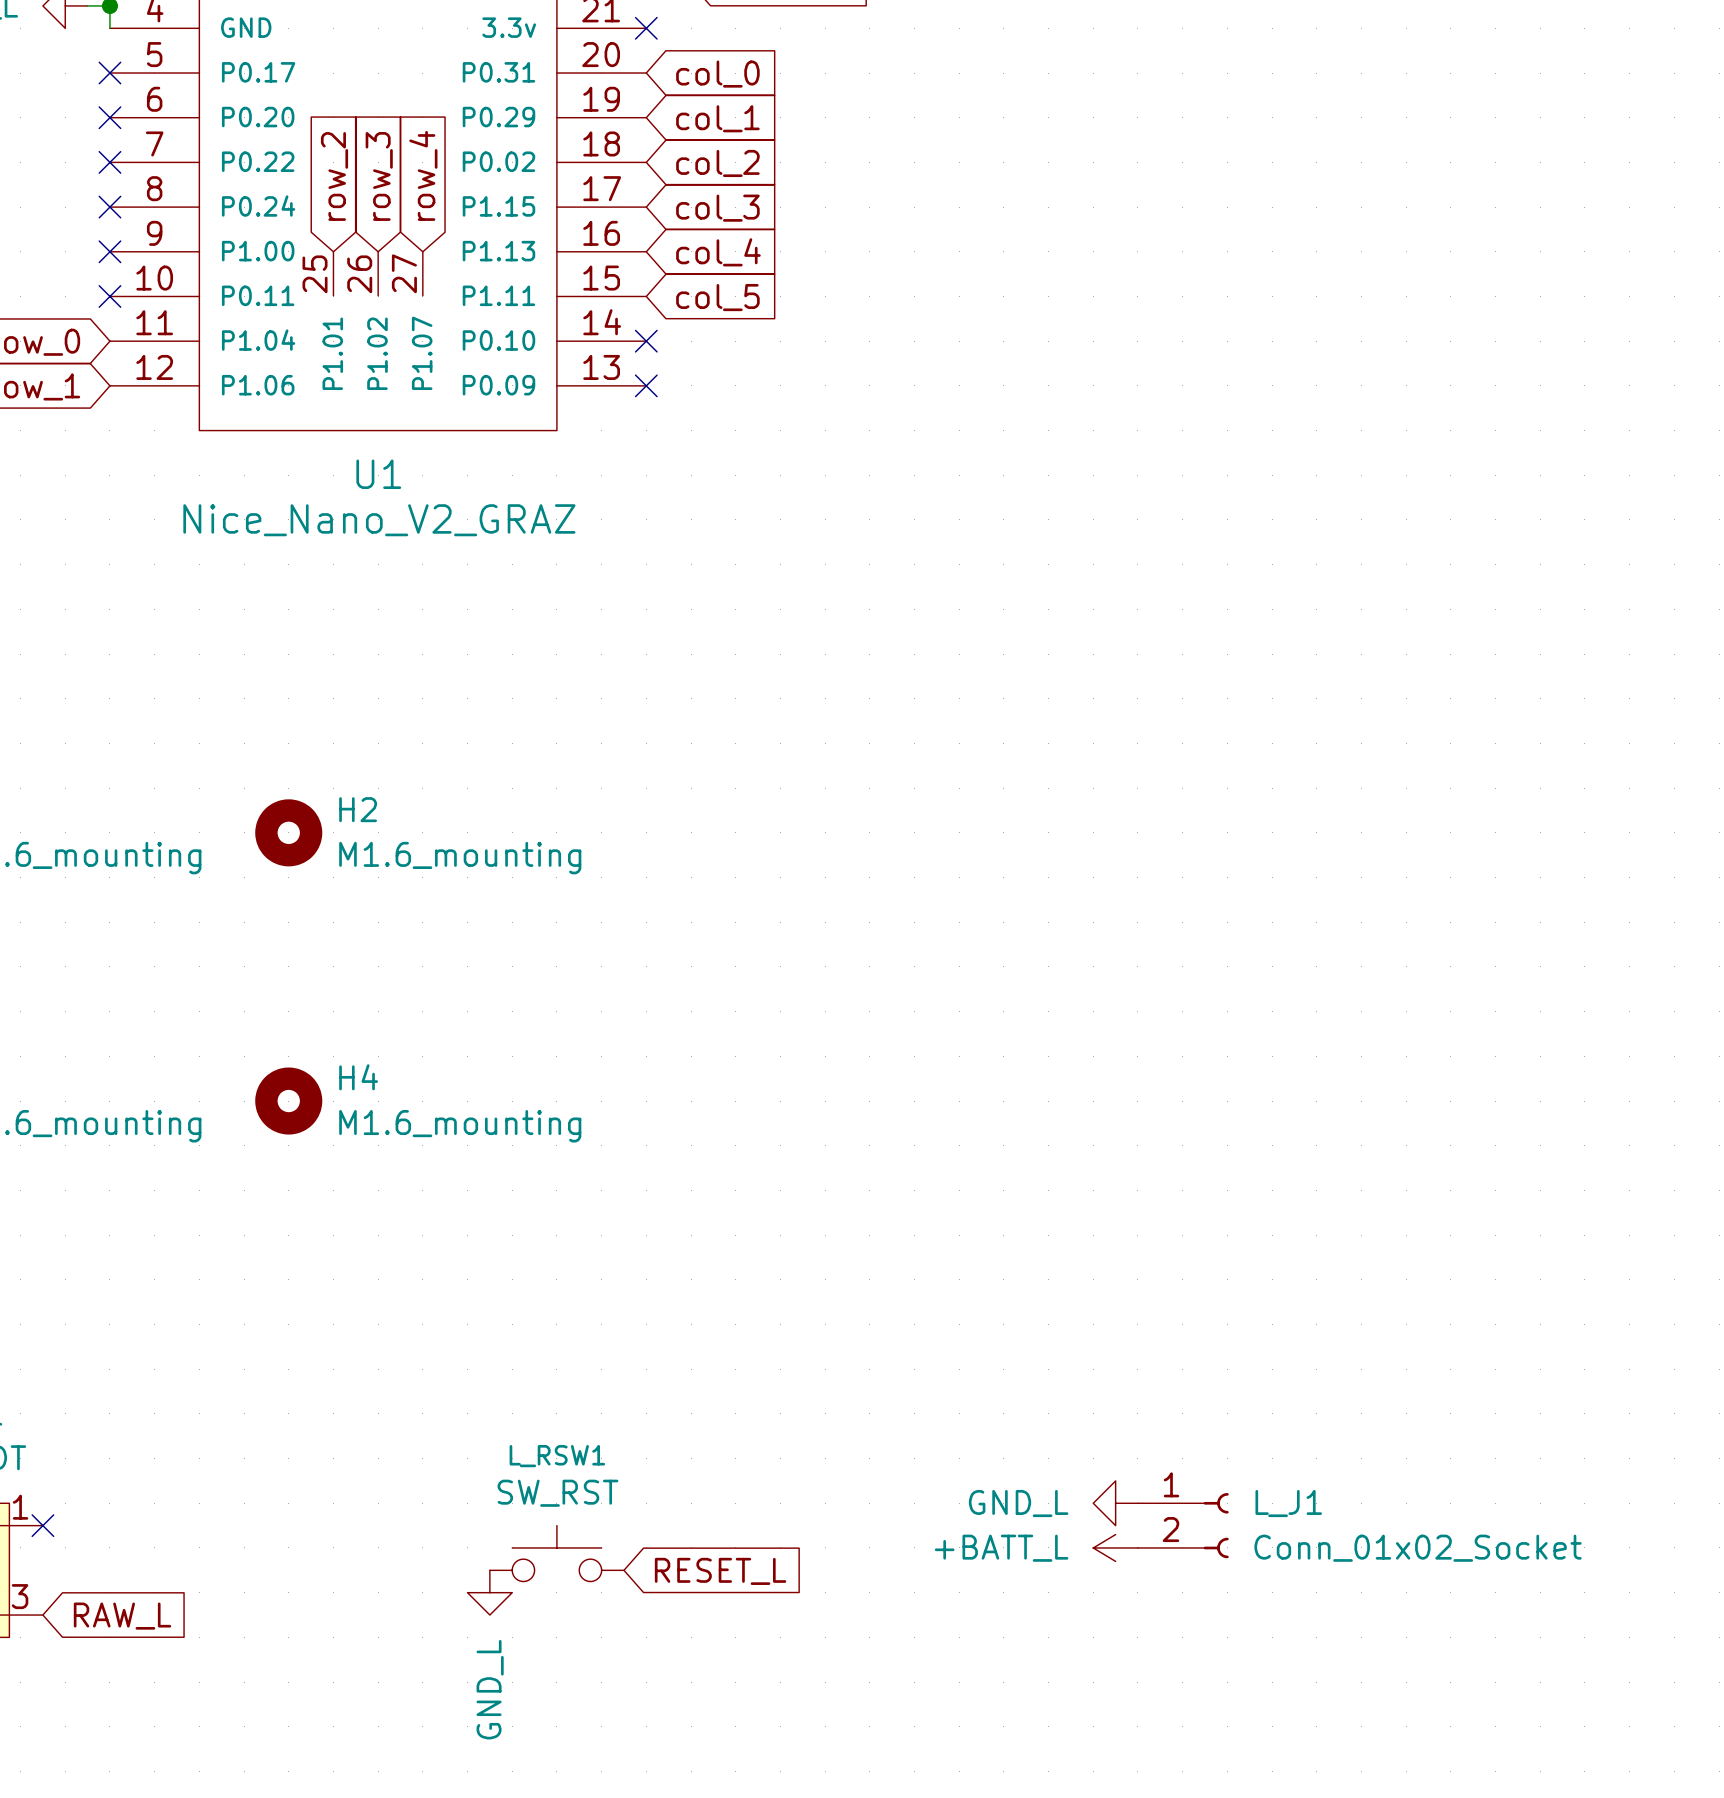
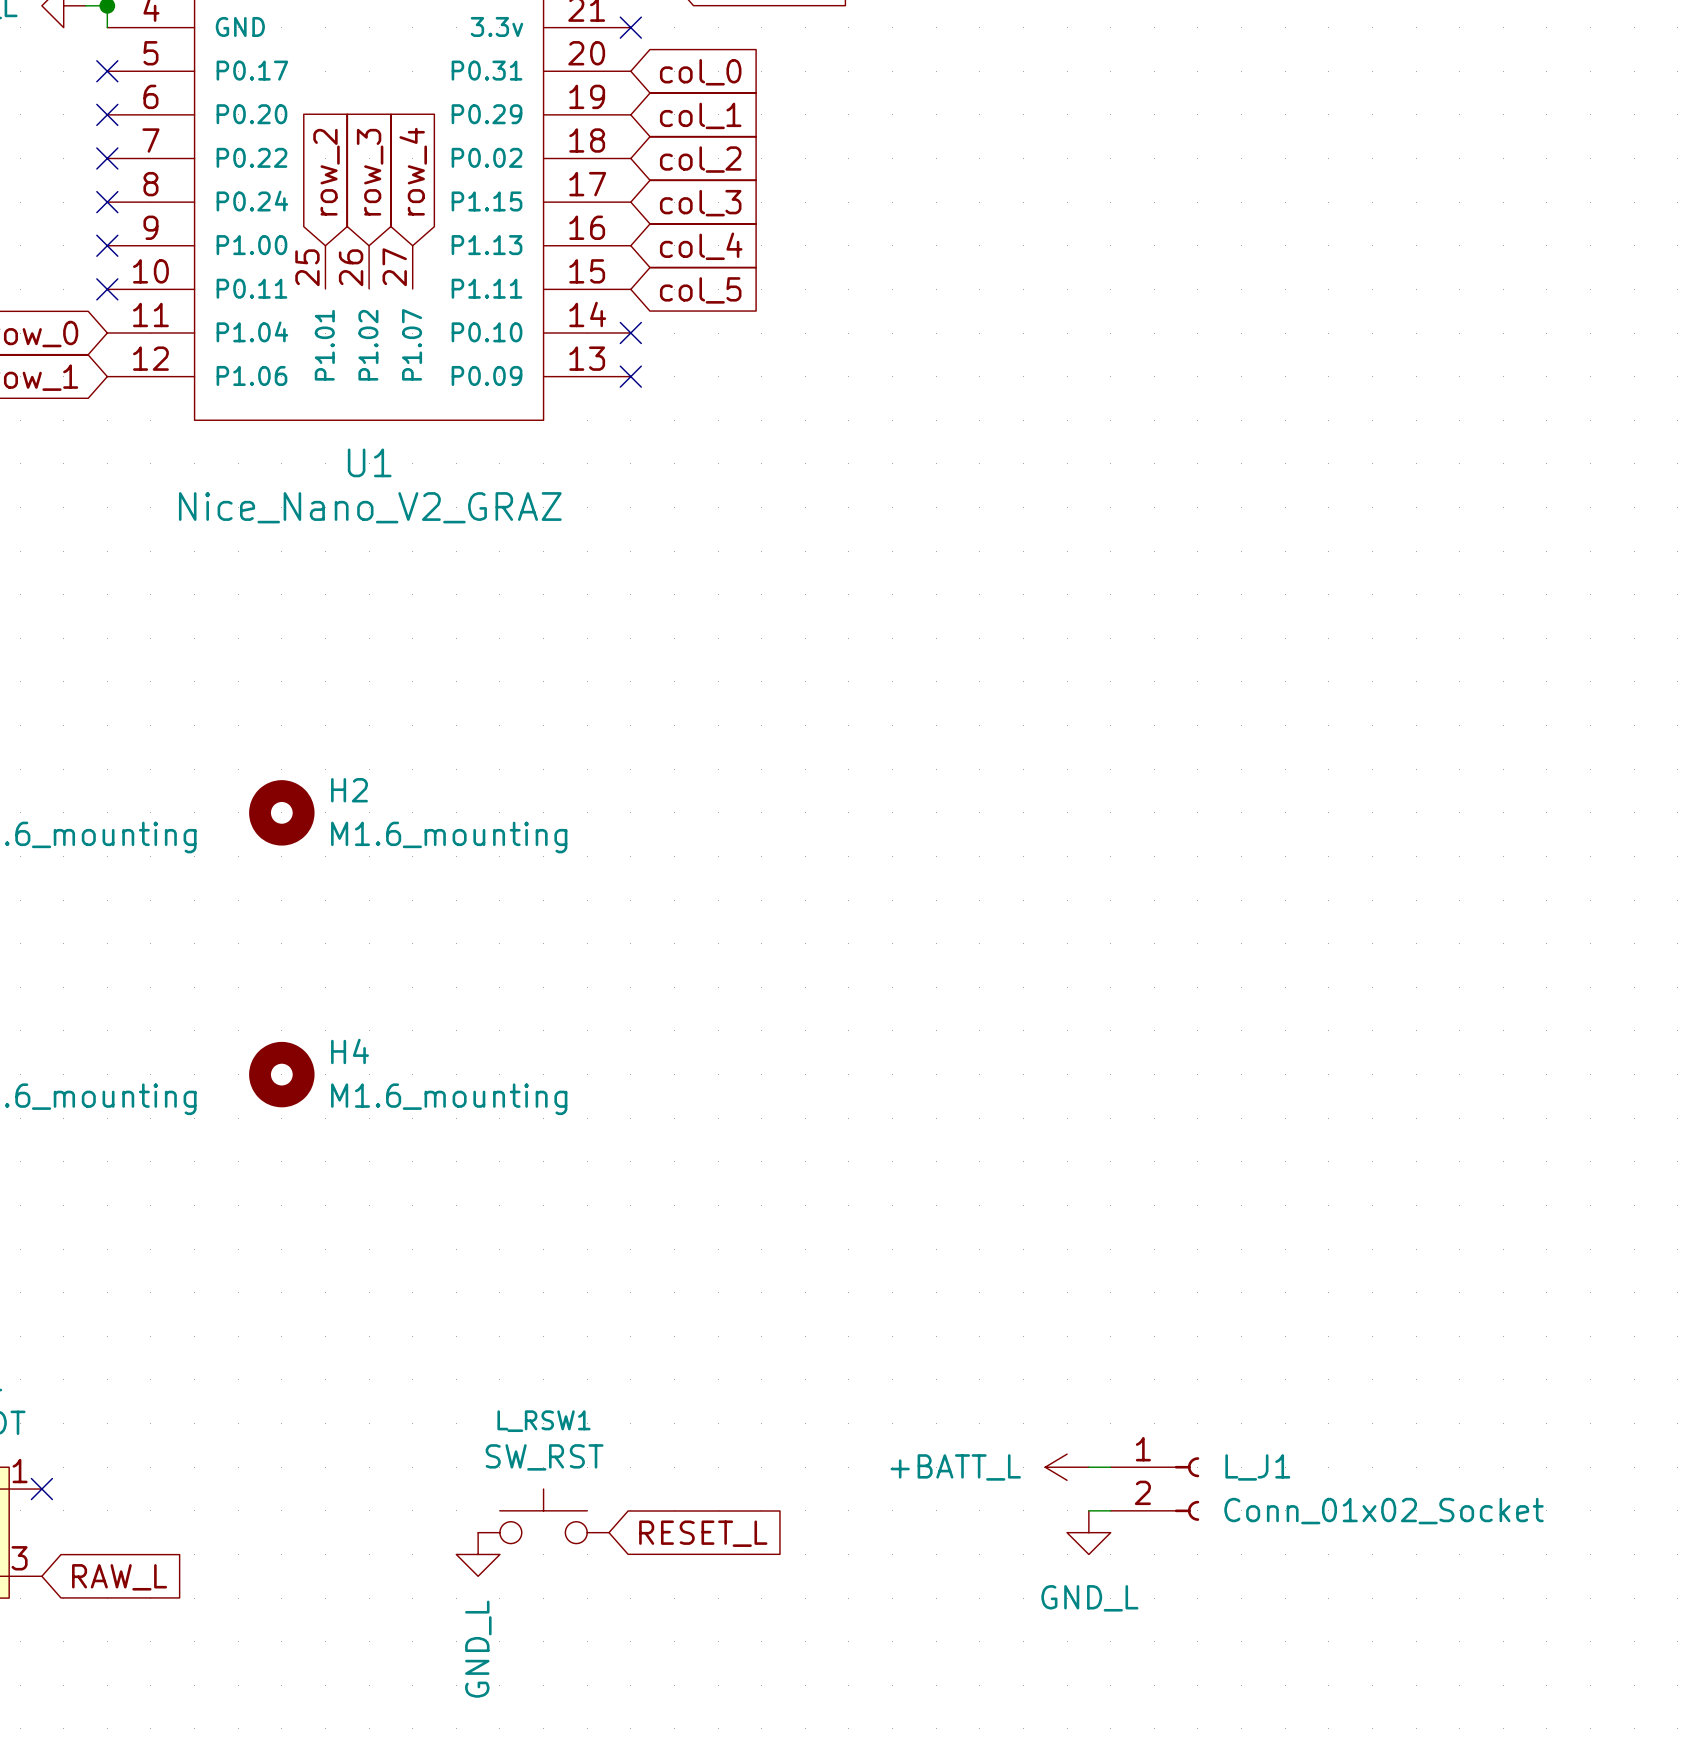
power symbol text position: GND_L (1018, 1503) -> GND_L (1089, 1598)
power symbol rotation: 0° (1115, 1503) -> 90° counterclockwise (1088, 1532)
power symbol position: GND_L (1115, 1503) -> GND_L (1088, 1532)
power symbol position: +BATT_L (1115, 1547) -> +BATT_L (1067, 1467)

